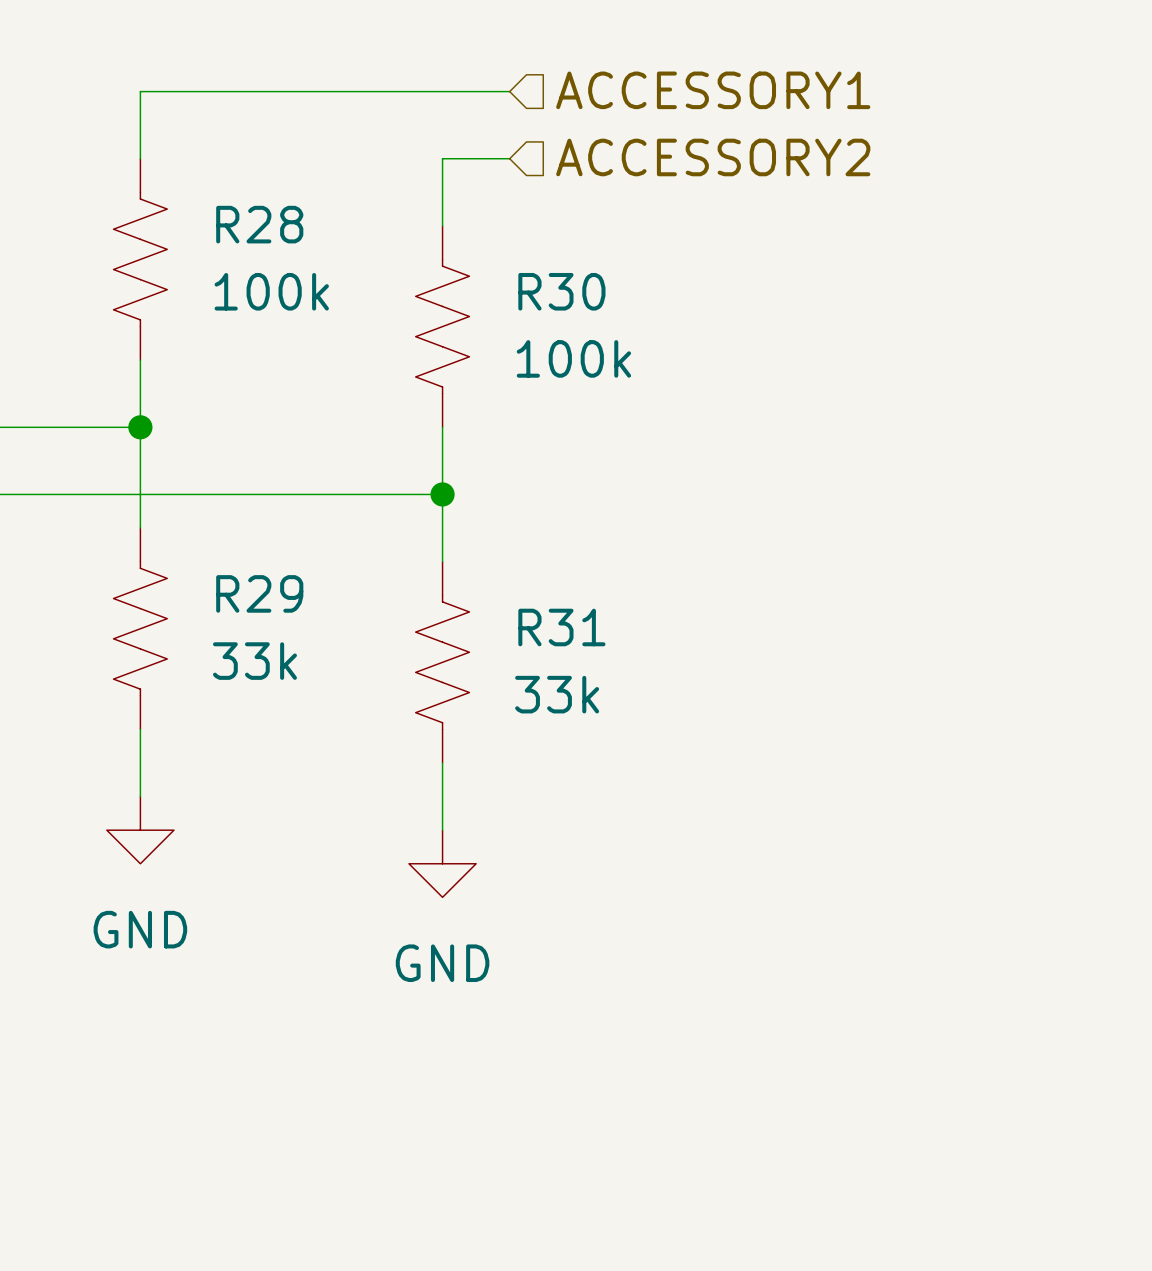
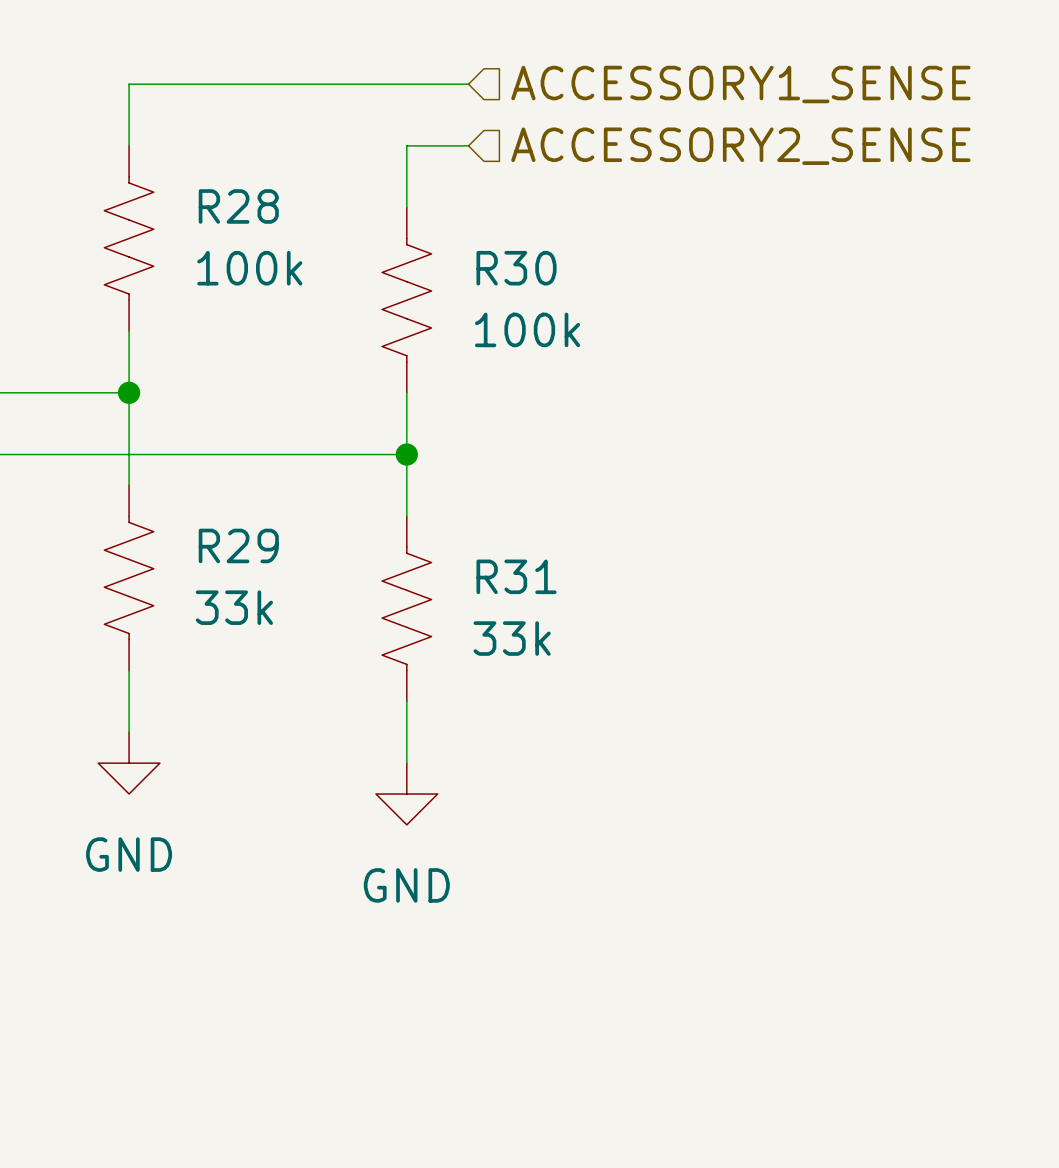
hierarchical label: ACCESSORY1 (713, 90) -> ACCESSORY1_SENSE (740, 84)
hierarchical label: ACCESSORY2 (713, 157) -> ACCESSORY2_SENSE (740, 146)

